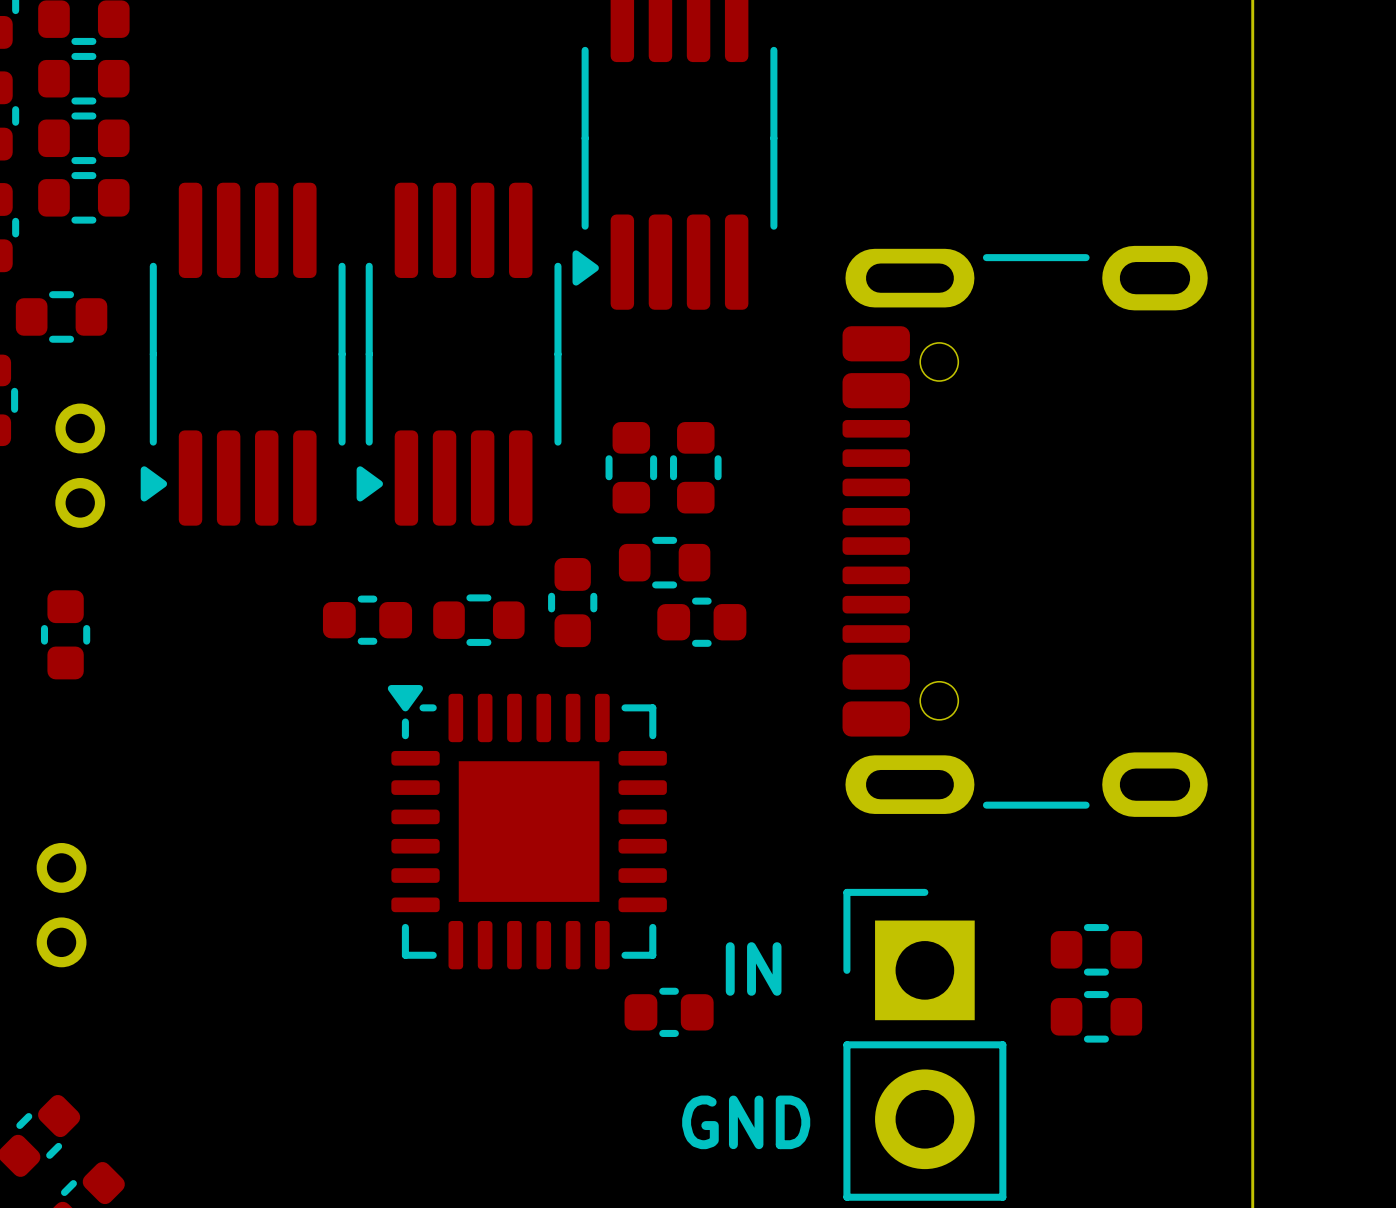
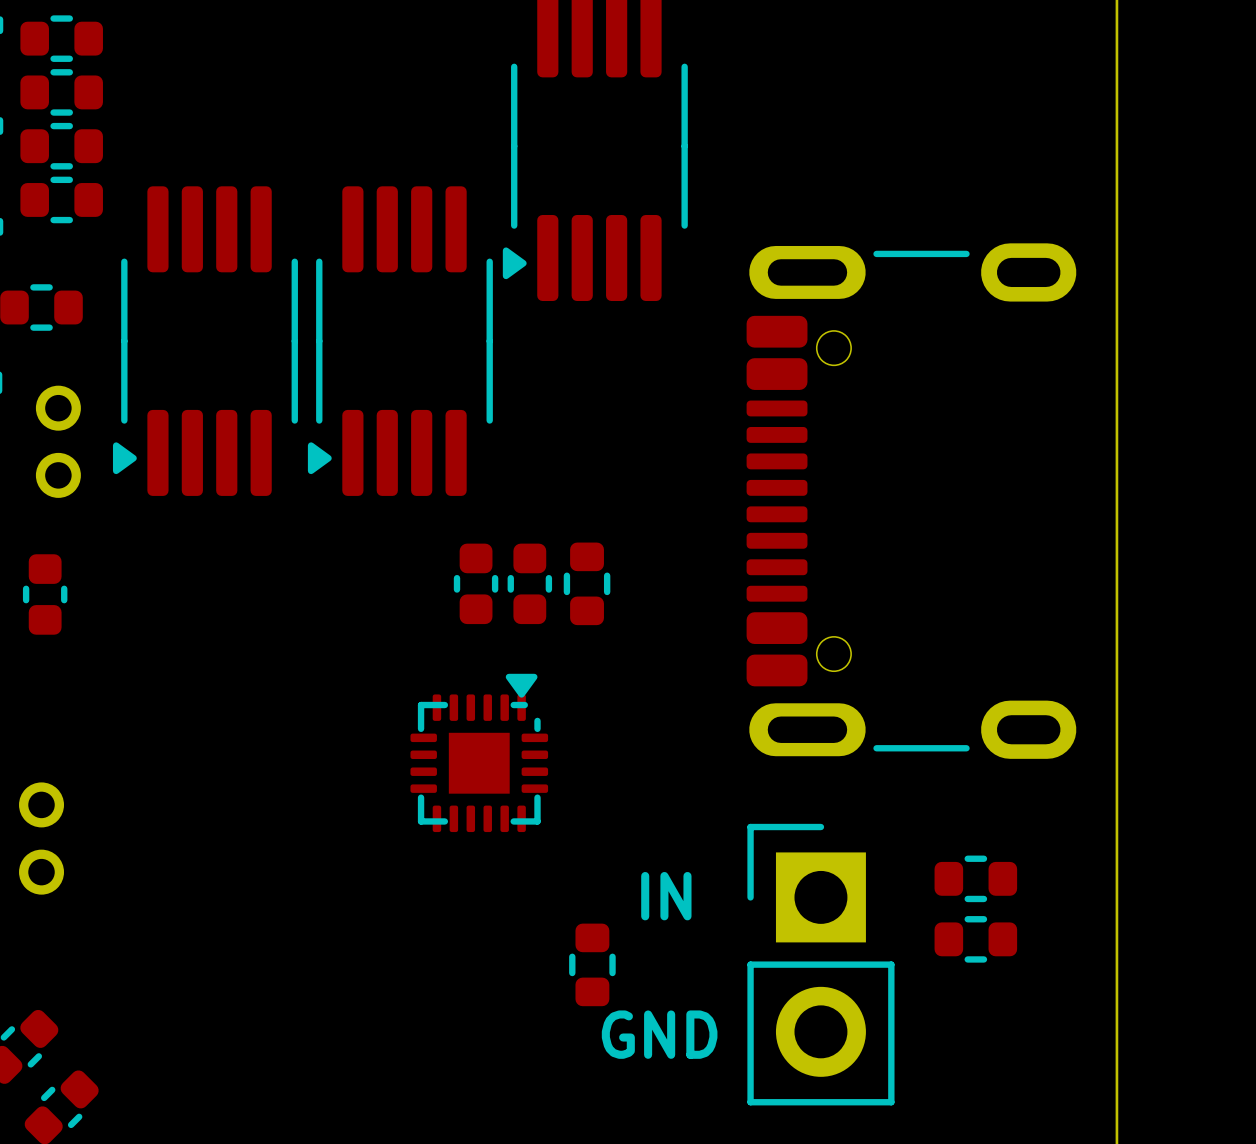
part: (631, 467) -> none
part: (695, 467) -> none
part rotation: 0° (664, 562) -> 90° clockwise (587, 583)
part position: (664, 562) -> (587, 583)
part: (572, 602) -> none
part: (367, 620) -> none
part: (478, 620) -> none
part: (701, 622) -> none
part: none -> (476, 583)
part: none -> (529, 583)
part footprint: [387, 685, 667, 970] -> [410, 673, 549, 833]
part footprint: [624, 987, 714, 1037] -> [569, 923, 616, 1007]

